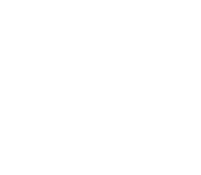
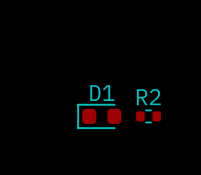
D1: none -> (99, 116)
R2: none -> (148, 116)

